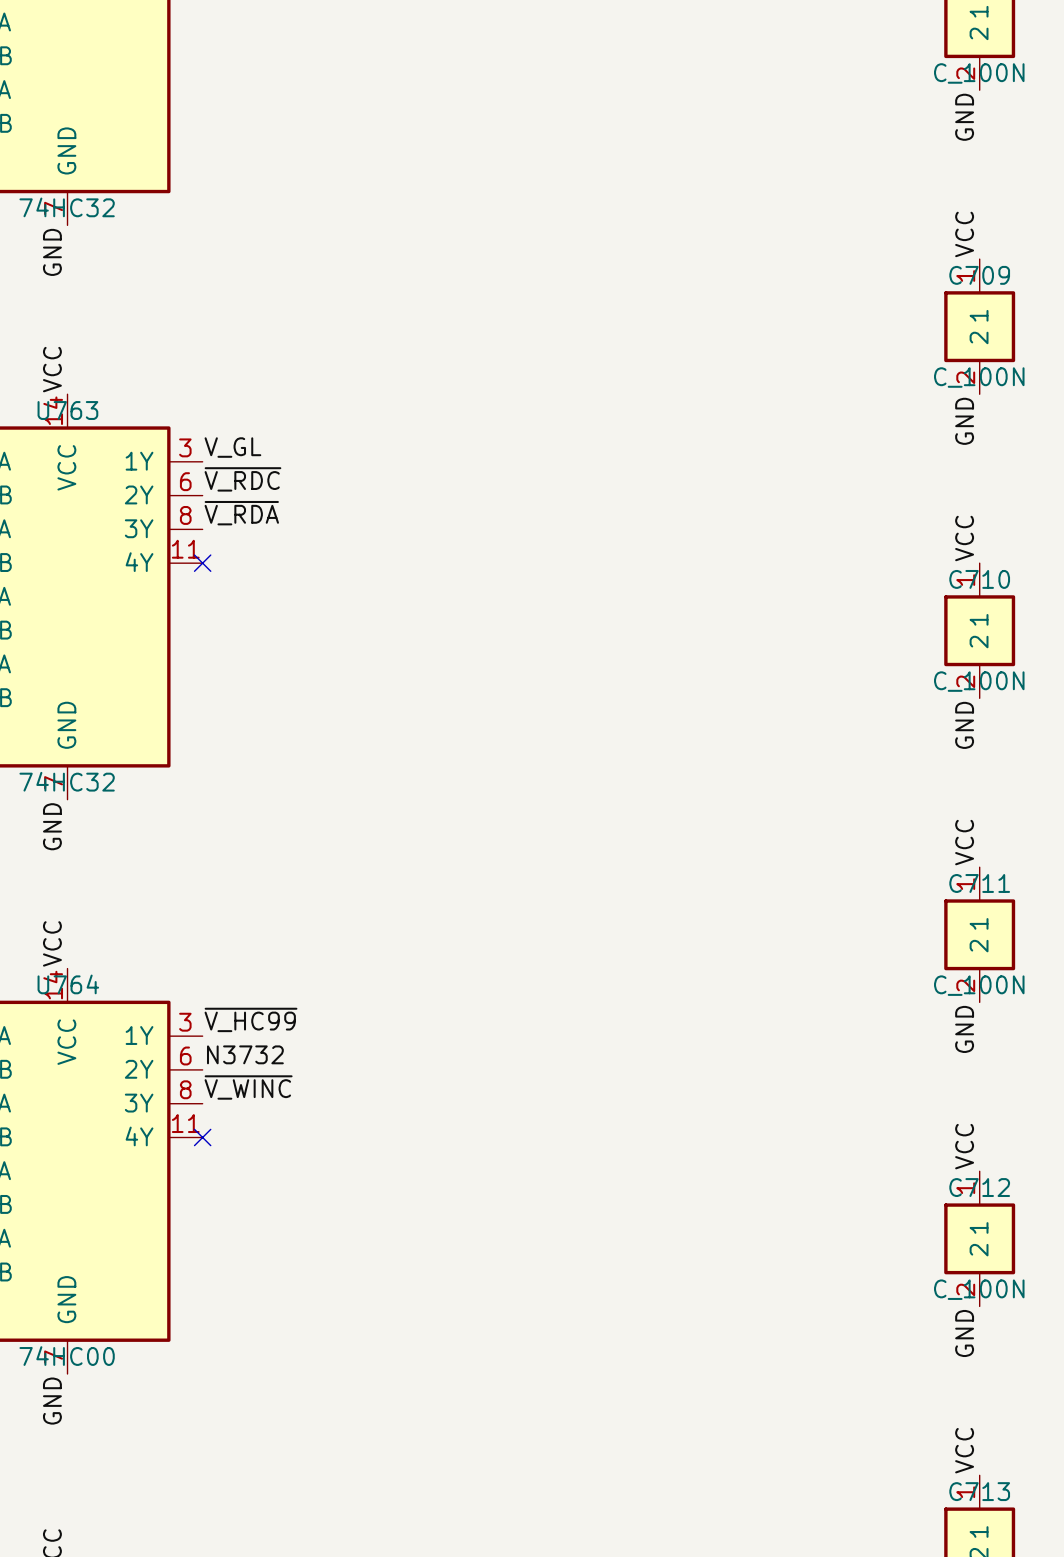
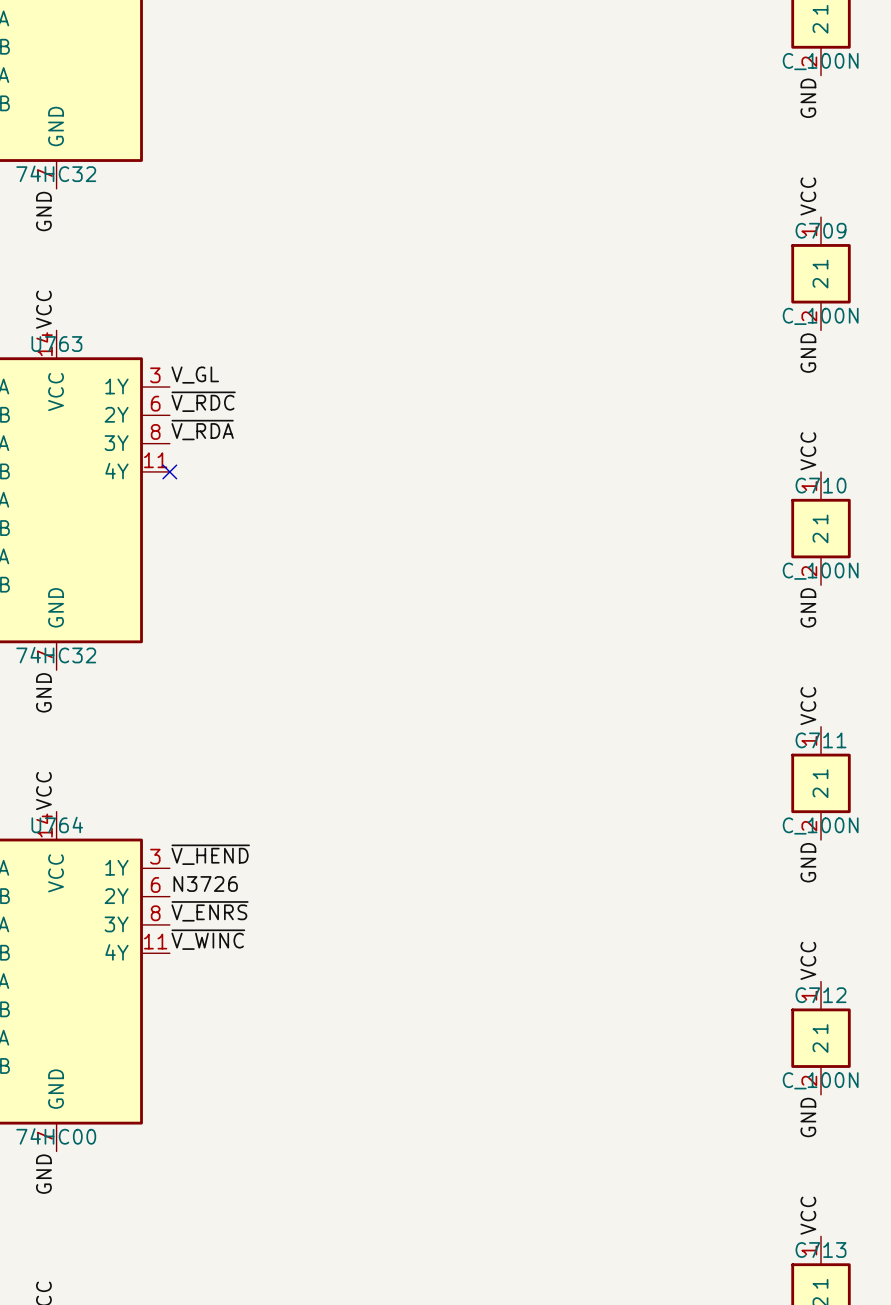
label: ~{V_HC99} (250, 1019) -> ~{V_HEND} (210, 854)
label: N3732 (245, 1054) -> N3726 (205, 884)
label: ~{V_WINC} (248, 1087) -> ~{V_ENRS} (210, 911)
label: none -> ~{V_WINC} (208, 939)
no-connect mark: (202, 1137) -> none

